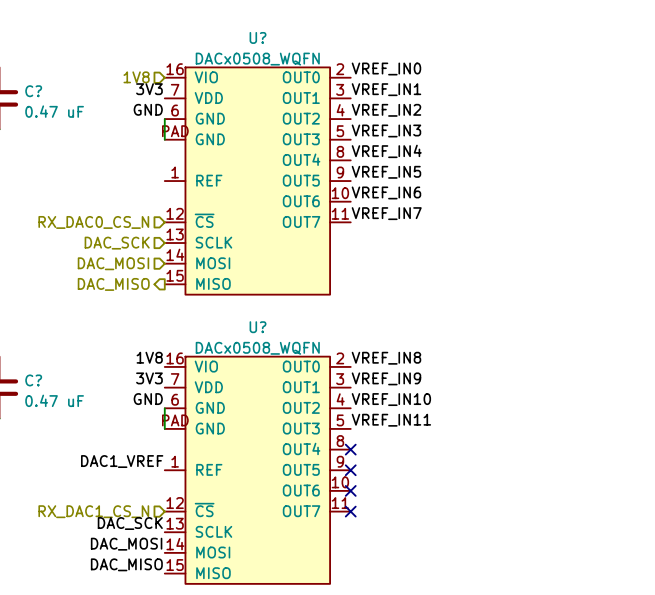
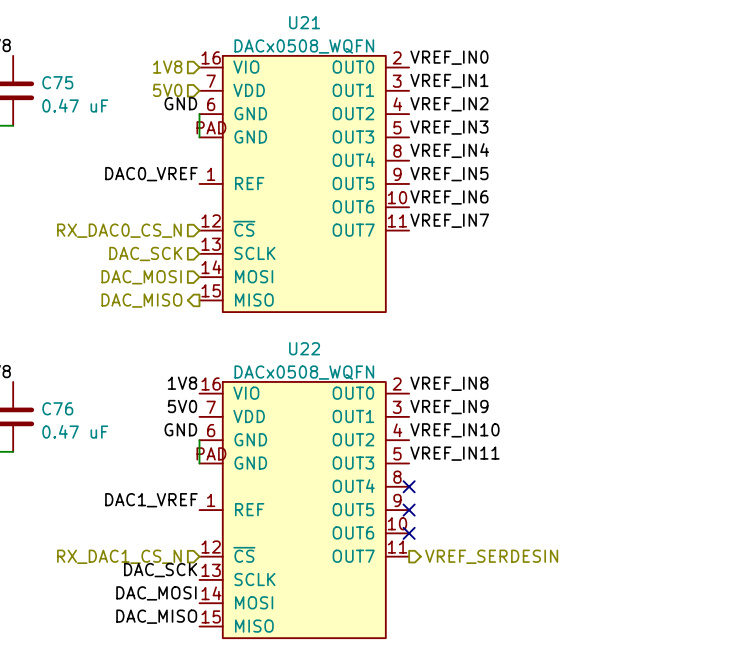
U? name: U? (258, 37) -> U21 (304, 22)
label: 3V3 (149, 89) -> none
C? name: C? (33, 91) -> C75 (57, 82)
hierarchical label: none -> 5V0 (167, 90)
label: none -> DAC0_VREF (151, 174)
U? name: U? (258, 327) -> U22 (304, 348)
label: 3V3 (149, 378) -> 5V0 (182, 406)
C? name: C? (33, 380) -> C76 (57, 408)
no-connect mark: (350, 511) -> none
hierarchical label: none -> VREF_SERDESIN (491, 556)

